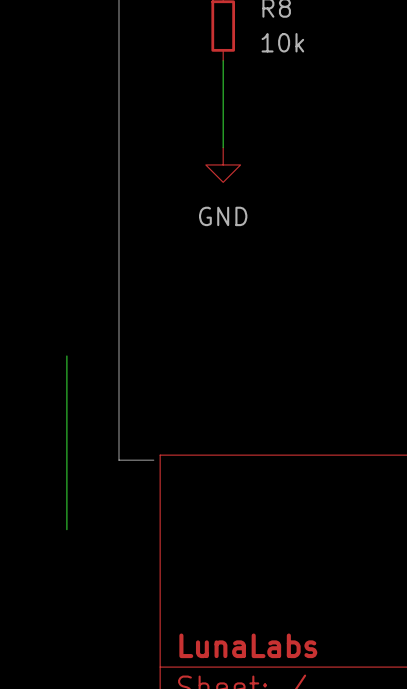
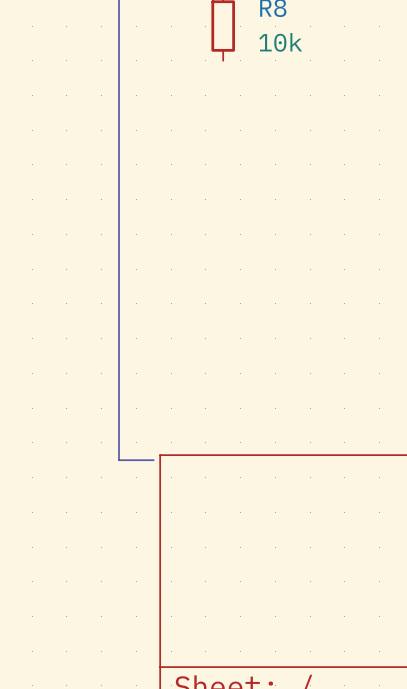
wire: (223, 60) (223, 147) -> none
power symbol: GND (223, 164) -> none
wire: (66, 356) (66, 529) -> none
title block: LunaLabs (248, 645) -> none

